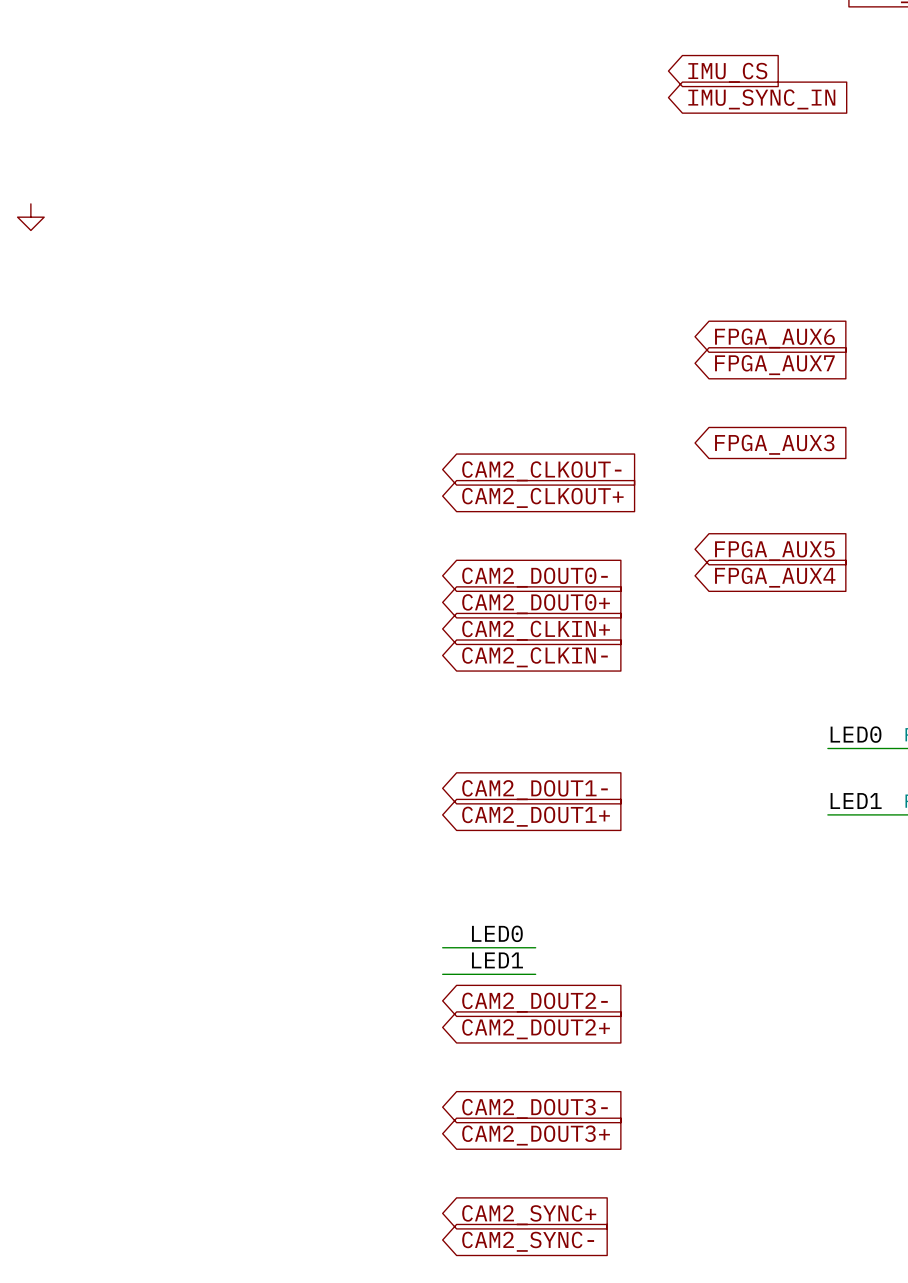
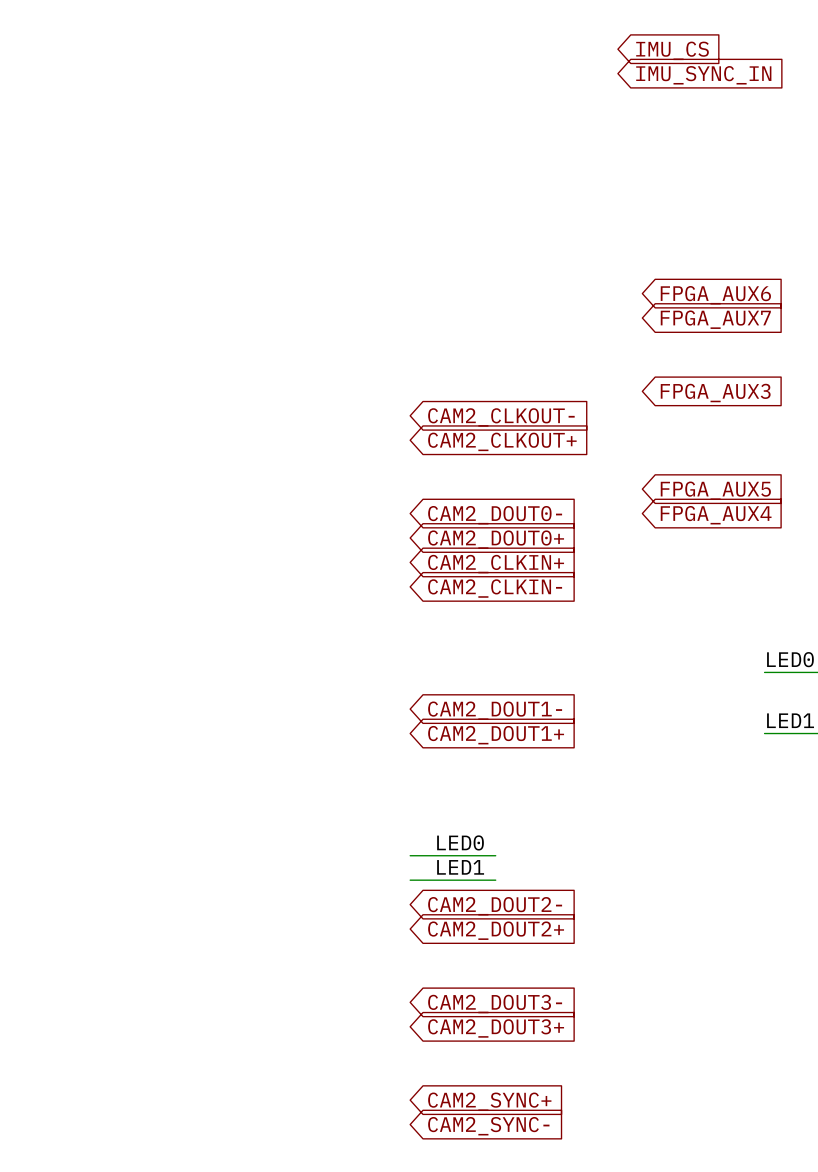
power symbol: (30, 217) -> none

